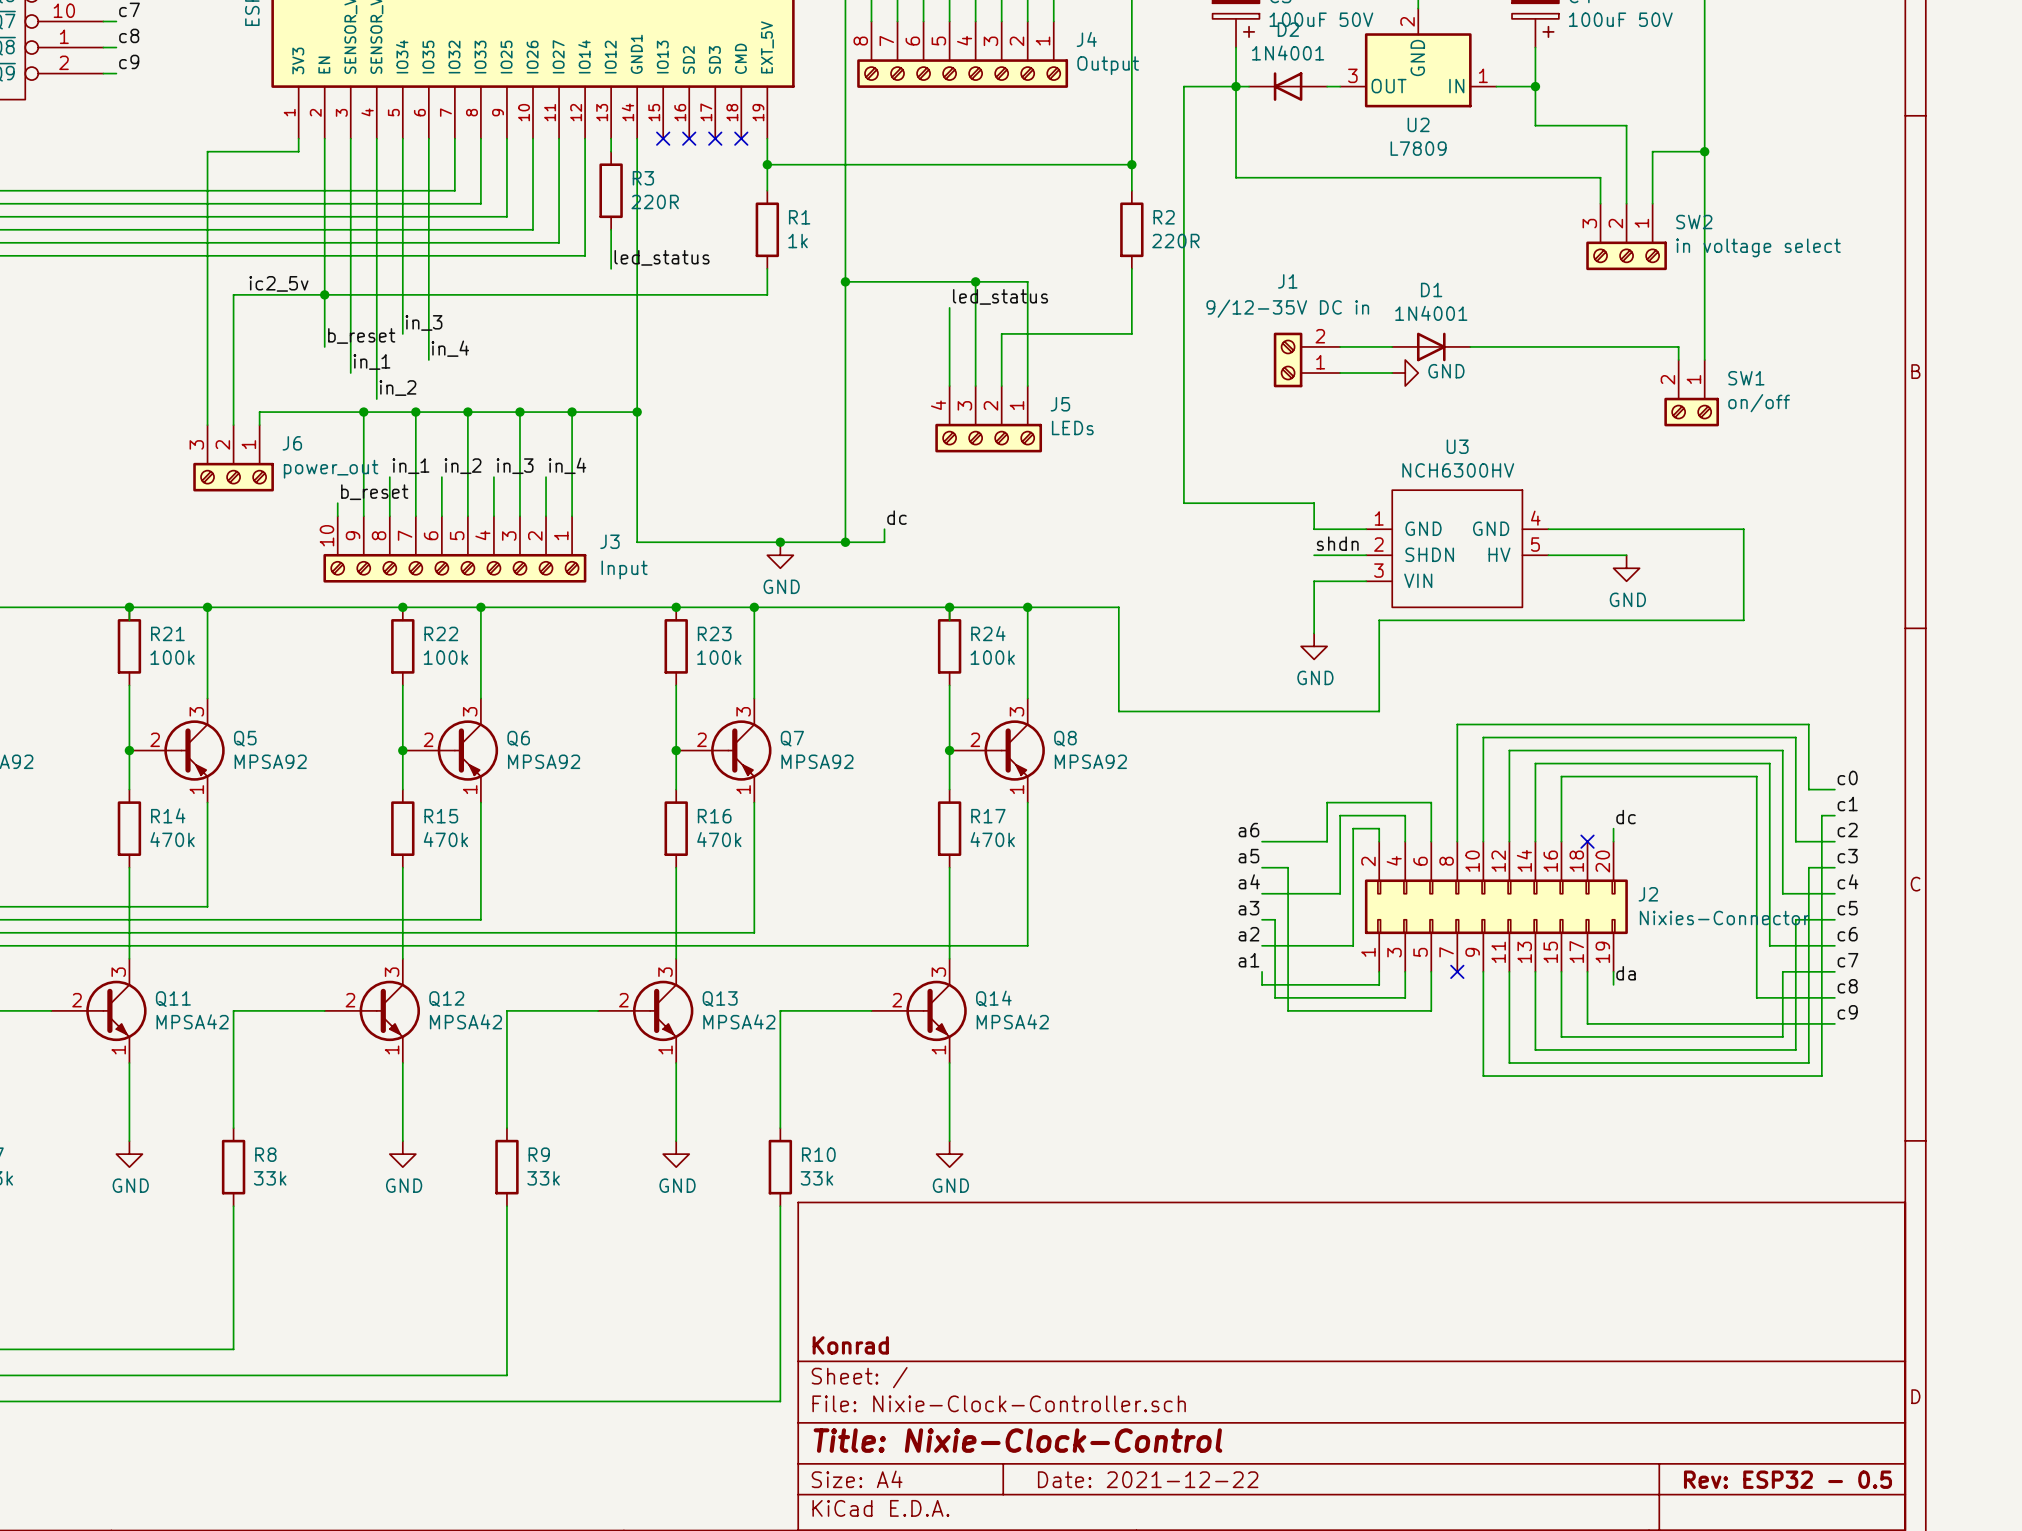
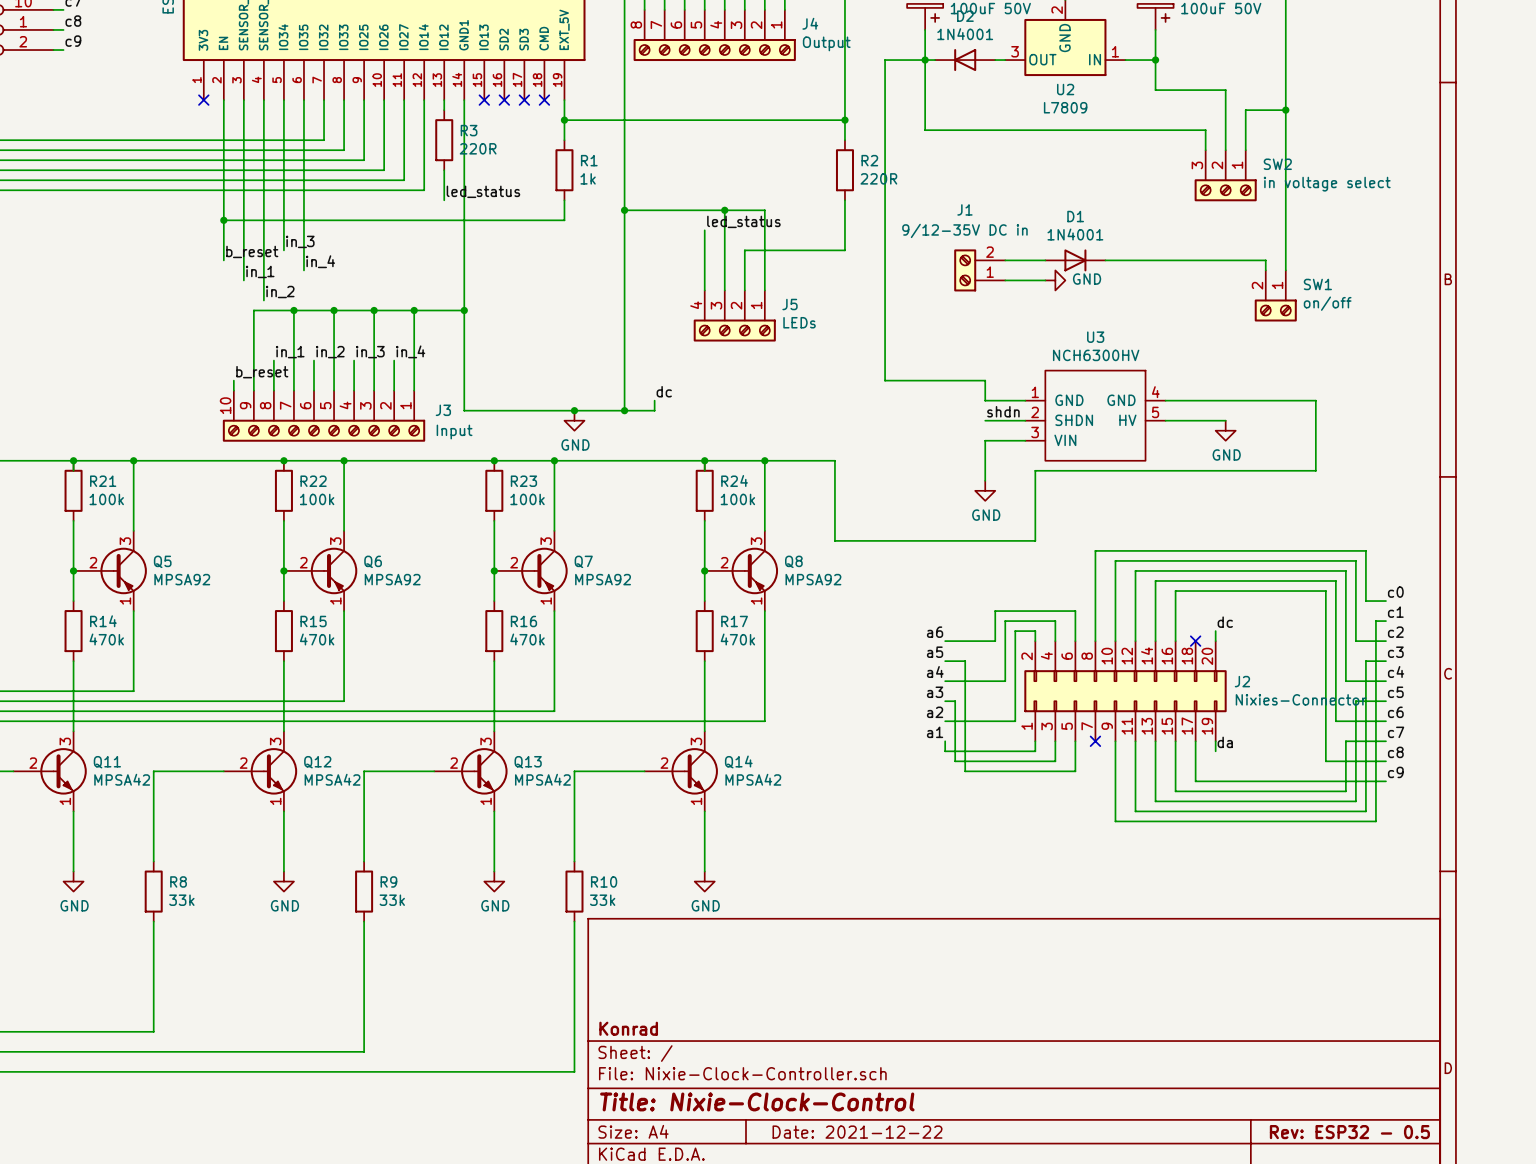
wire: (298, 138) (298, 151) (207, 151) (207, 425) -> none
no-connect mark: none -> (203, 100)
label: ic2_5v (278, 283) -> none
wire: (324, 294) (233, 294) (233, 425) -> none
wire: (363, 412) (259, 412) (259, 425) -> none
junction: (363, 412) -> none
J6: power_out (233, 458) -> none

